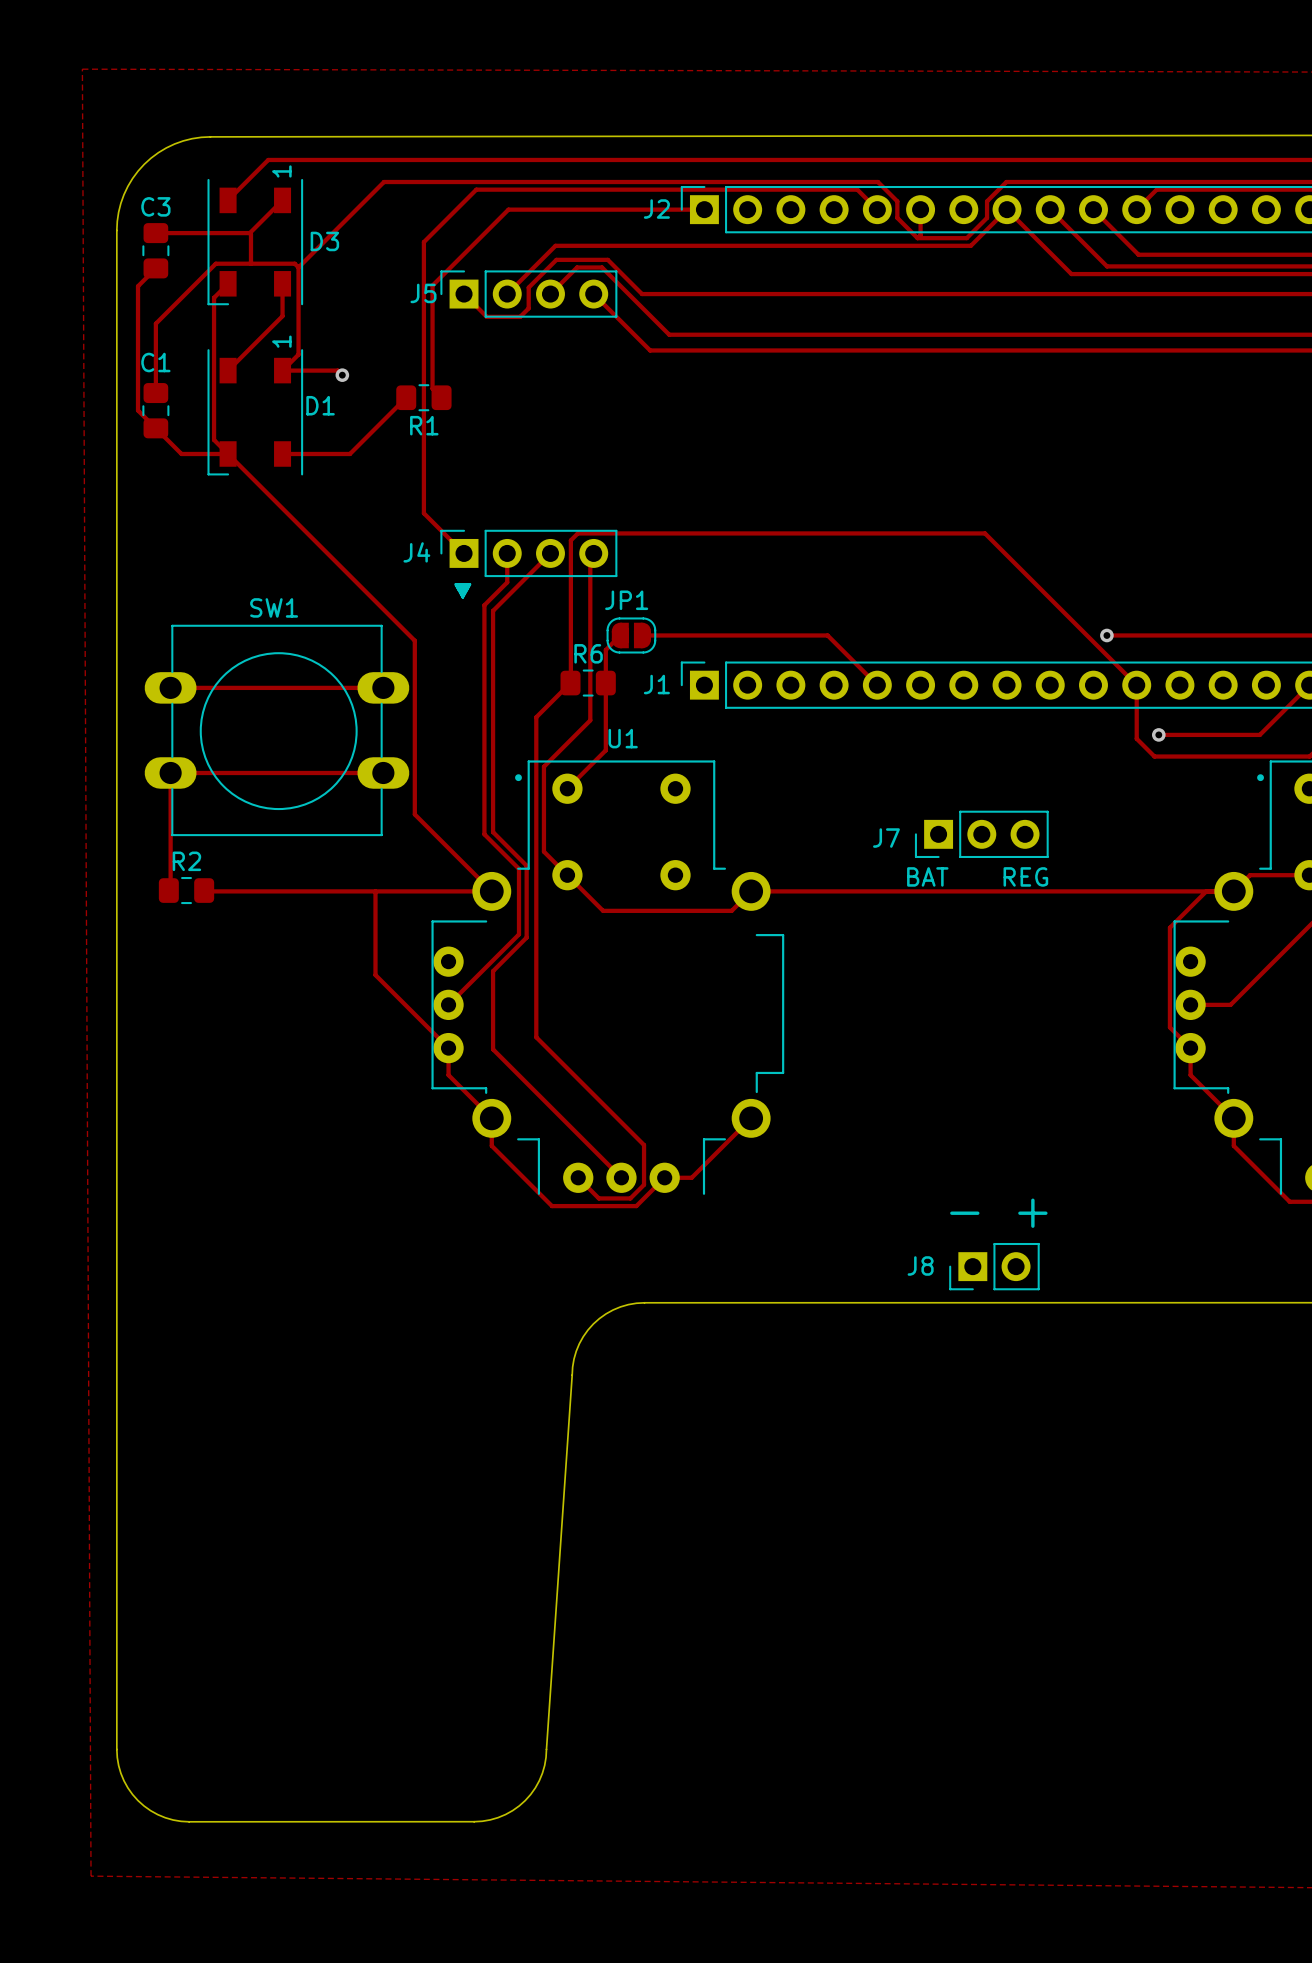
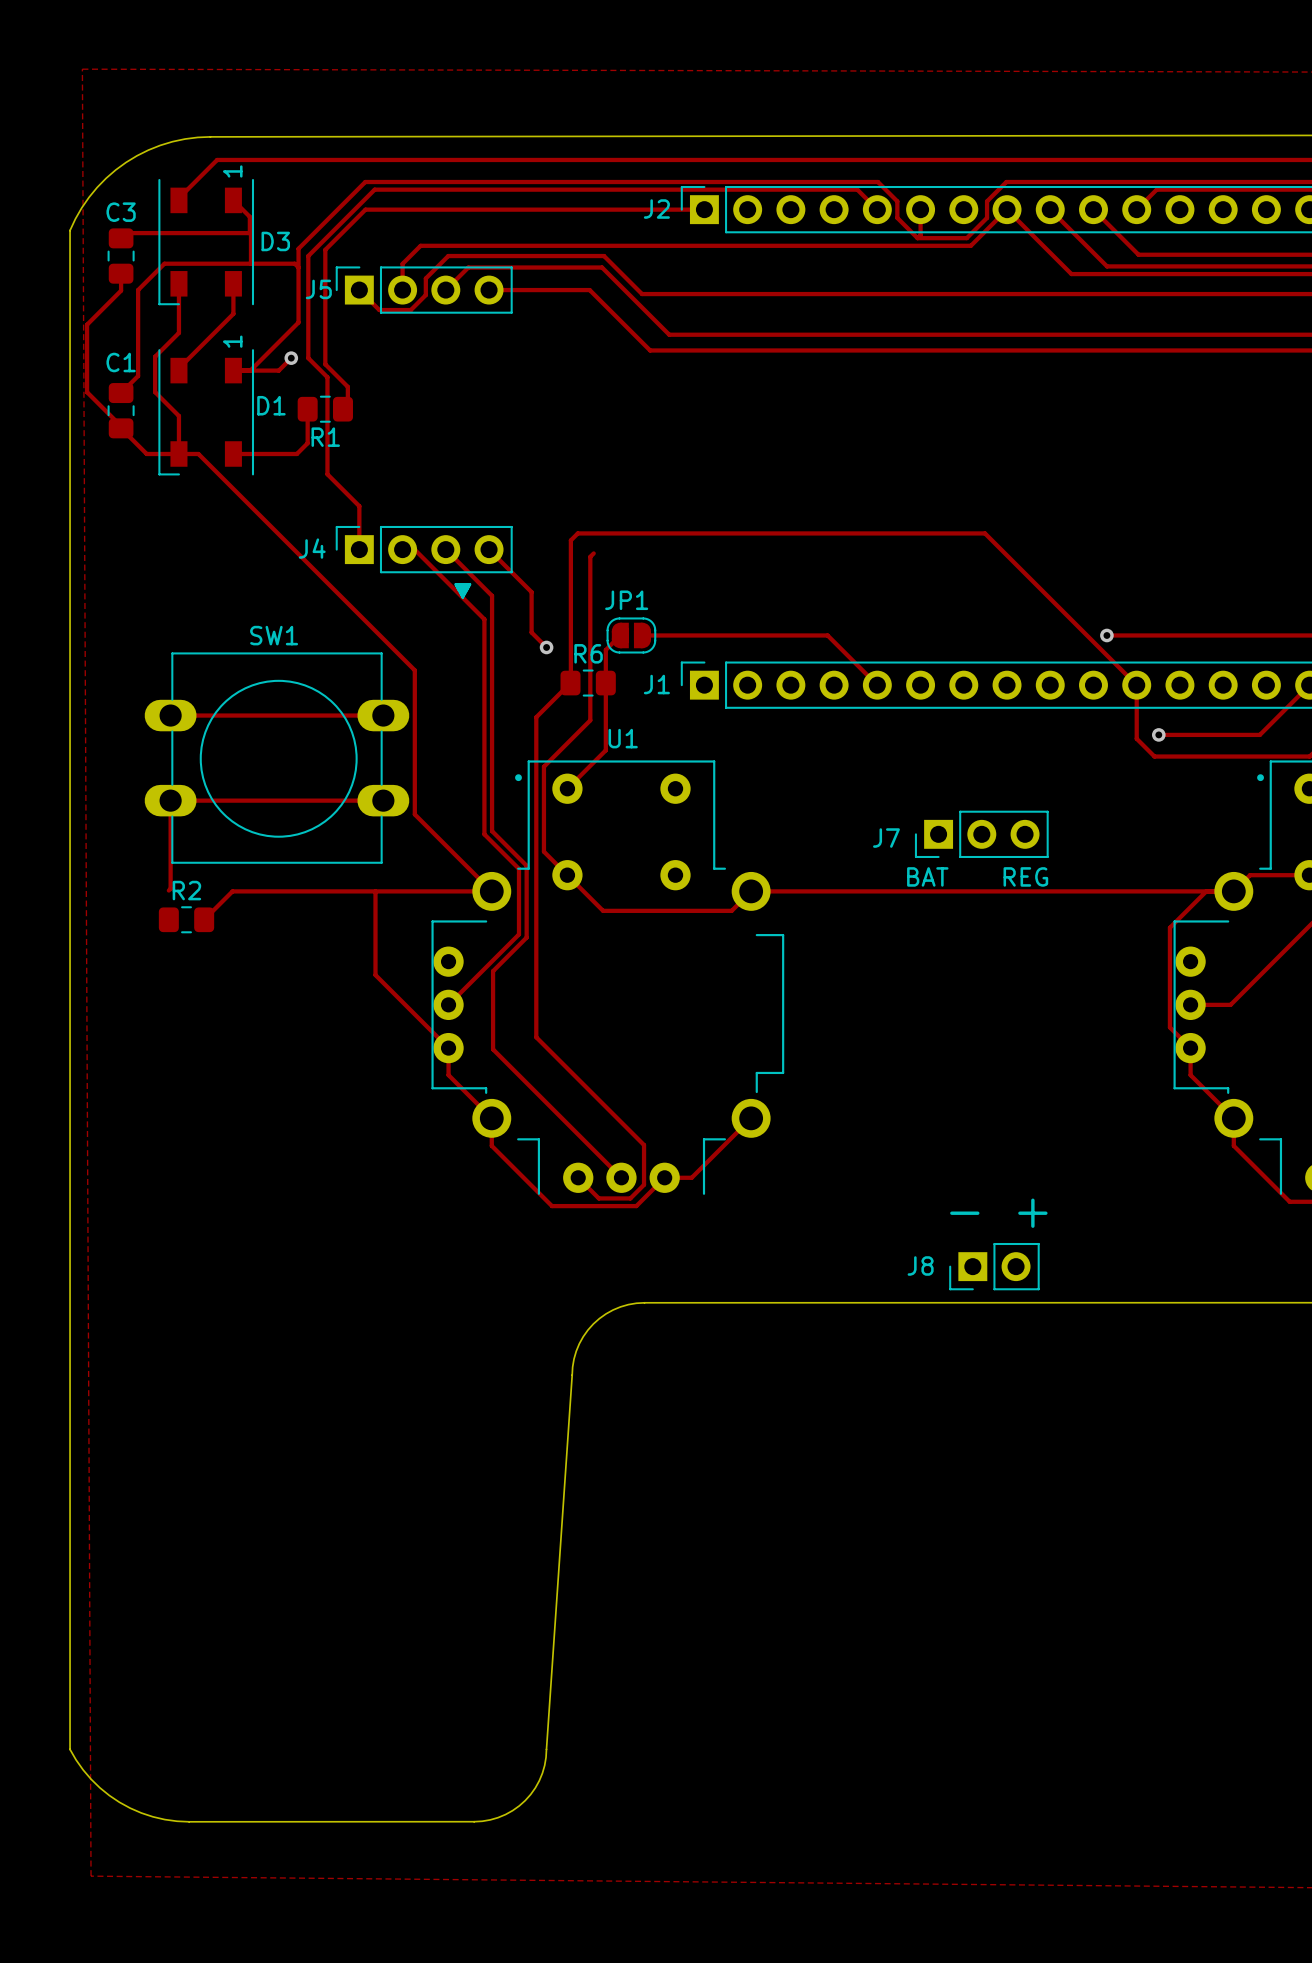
board edge: (210, 136) (192, 138) (174, 144) (158, 152) (144, 164) (132, 178) (123, 194) (118, 212) (116, 230) (116, 1749) (118, 1765) (124, 1780) (138, 1800) (150, 1810) (165, 1817) (189, 1821) -> (210, 136) (185, 139) (160, 145) (126, 162) (97, 187) (81, 207) (70, 230) (70, 1749) (91, 1779) (119, 1802) (152, 1816) (189, 1821)
track: (268, 159) (228, 200) -> (268, 159) (217, 159) (178, 198) (178, 200)
track: (384, 182) (298, 267) -> (384, 182) (365, 182) (298, 248) (298, 267)
track: (476, 189) (423, 242) (423, 513) (464, 553) -> (476, 189) (374, 189) (308, 256) (308, 358) (327, 377) (327, 474) (359, 506) (359, 549)
track: (282, 200) (249, 233) -> (233, 200) (249, 216) (249, 233)
track: (508, 209) (432, 285) (432, 388) (441, 397) -> (508, 209) (365, 209) (325, 249) (325, 364) (347, 386) (347, 404) (342, 409)
track: none -> (155, 233) (126, 233) (121, 238)
D3 position: (255, 242) -> (206, 242)
track: (555, 245) (507, 294) -> (555, 245) (420, 245) (402, 263) (402, 290)
C3 position: (155, 250) -> (121, 256)
track: (607, 259) (556, 259) (528, 287) (528, 308) (520, 316) (486, 316) (464, 294) -> (607, 259) (604, 256) (448, 256) (425, 278) (425, 295) (410, 310) (379, 310) (359, 290)
track: (215, 263) (155, 323) (155, 393) -> (215, 263) (164, 263) (138, 290) (138, 376) (121, 393)
track: (577, 267) (550, 294) -> (577, 267) (468, 267) (445, 290)
track: (155, 268) (138, 286) (138, 410) (181, 453) -> (121, 273) (121, 290) (87, 324) (87, 392) (146, 453) (181, 453)
track: none -> (178, 283) (178, 332) (155, 356) (155, 392) (178, 416) (178, 453)
track: (228, 283) (214, 297) (214, 439) (414, 640) (414, 670) -> (198, 453) (414, 670)
track: none -> (233, 283) (233, 313) (178, 368) (178, 370)
track: (282, 283) (282, 316) (228, 370) -> none
track: none -> (489, 290) (589, 290) (593, 294)
J5 position: (528, 294) -> (424, 290)
track: (298, 322) (298, 354) (282, 370) (337, 370) (342, 375) -> (298, 322) (250, 370)
track: none -> (291, 358) (278, 370) (233, 370)
via position: (342, 375) -> (291, 358)
track: (406, 397) (349, 453) (296, 453) -> (307, 409) (307, 443) (296, 453)
R1 position: (423, 397) -> (325, 409)
C1 position: (155, 410) -> (121, 410)
D1 position: (255, 412) -> (206, 412)
track: (198, 453) (228, 453) -> none
track: none -> (233, 453) (282, 453)
track: none -> (489, 549) (531, 592) (531, 632) (546, 647)
track: (507, 553) (507, 582) (484, 605) (484, 619) -> (402, 549) (414, 549) (484, 619)
J4 position: (528, 553) -> (424, 549)
track: (550, 553) (493, 610) (493, 832) -> (445, 549) (492, 595) (493, 832)
via: none -> (546, 647)
track: (170, 687) (383, 687) -> (170, 715) (383, 715)
SW1 position: (276, 730) -> (276, 758)
track: (383, 772) (170, 772) (170, 800) -> (383, 800) (170, 800)
R2 position: (186, 890) -> (186, 919)
track: (204, 890) (232, 891) -> (204, 919) (232, 891)

